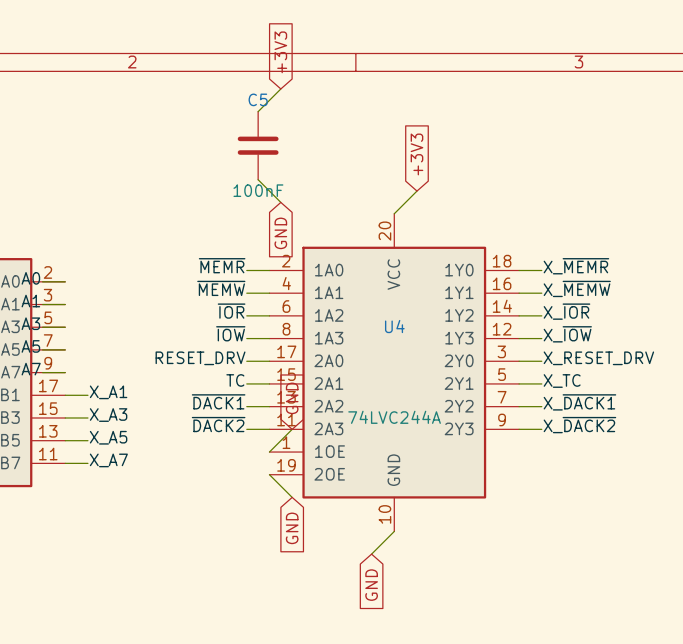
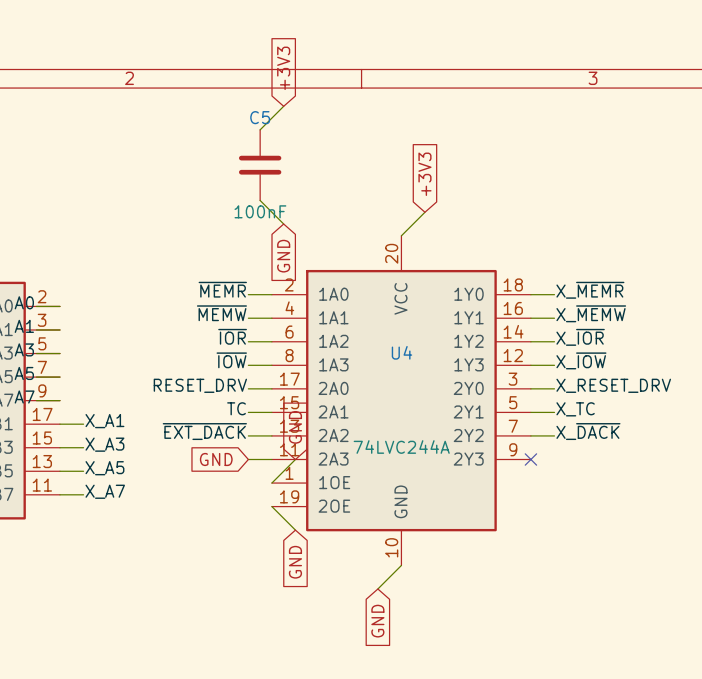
label: ~{DACK1} (218, 401) -> ~{EXT_DACK} (204, 431)
label: X_~{DACK1} (579, 402) -> X_~{DACK} (588, 431)
label: ~{DACK2} (218, 424) -> none
label: X_~{DACK2} (579, 425) -> none
global label: none -> GND (216, 459)
wire: (519, 429) (541, 429) -> none
no-connect mark: none -> (530, 459)

